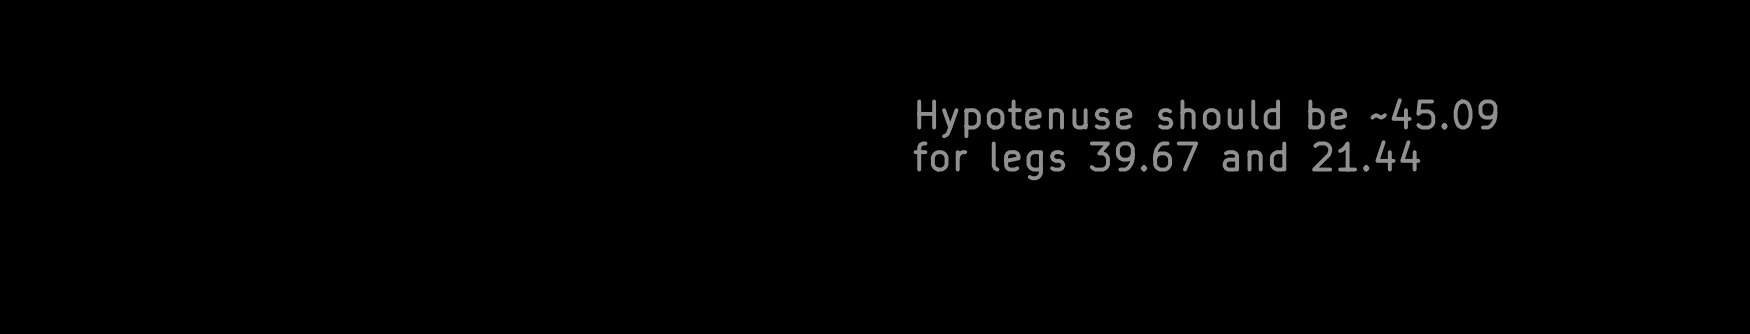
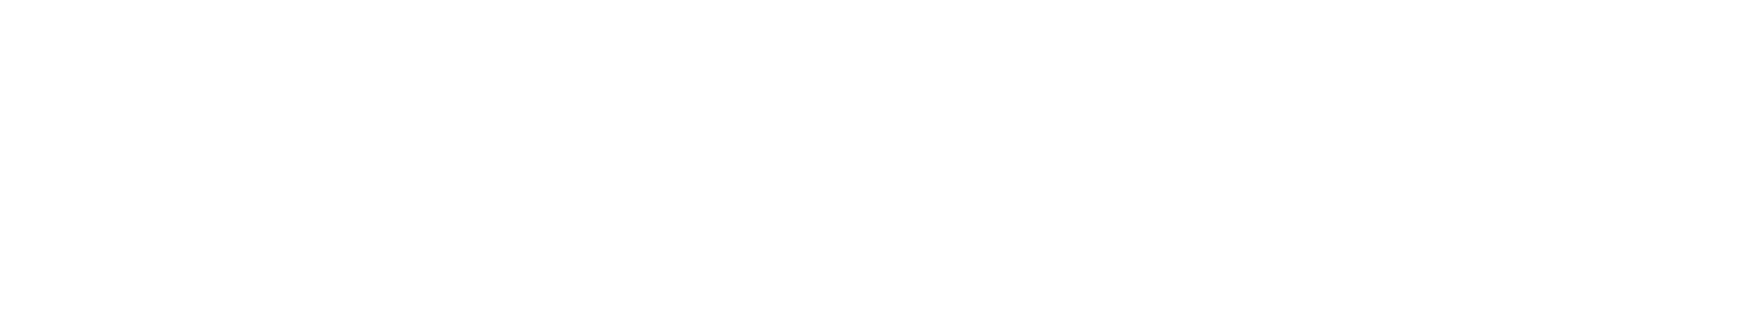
text: Hypotenuse should be ~45.09 (1207, 118) -> none
text: for legs 39.67 and 21.44 (1166, 160) -> none

